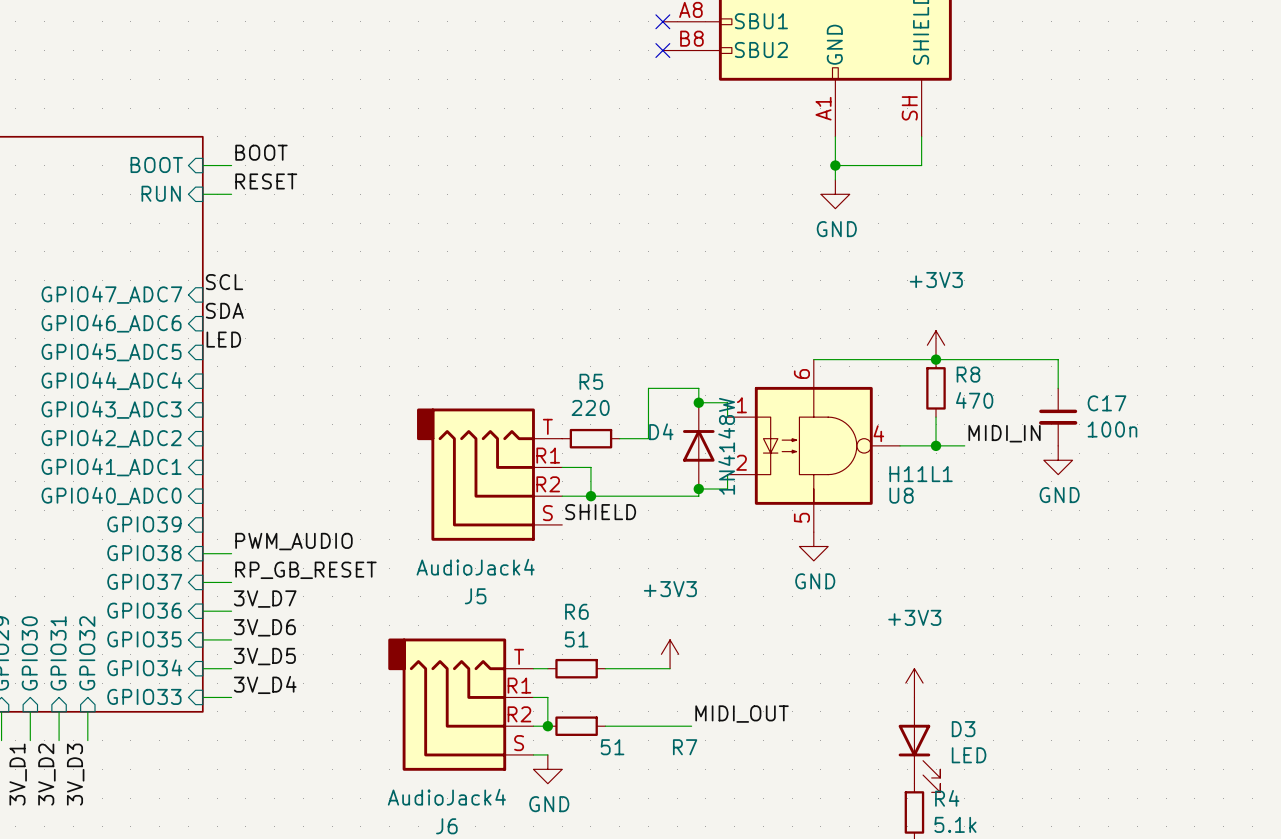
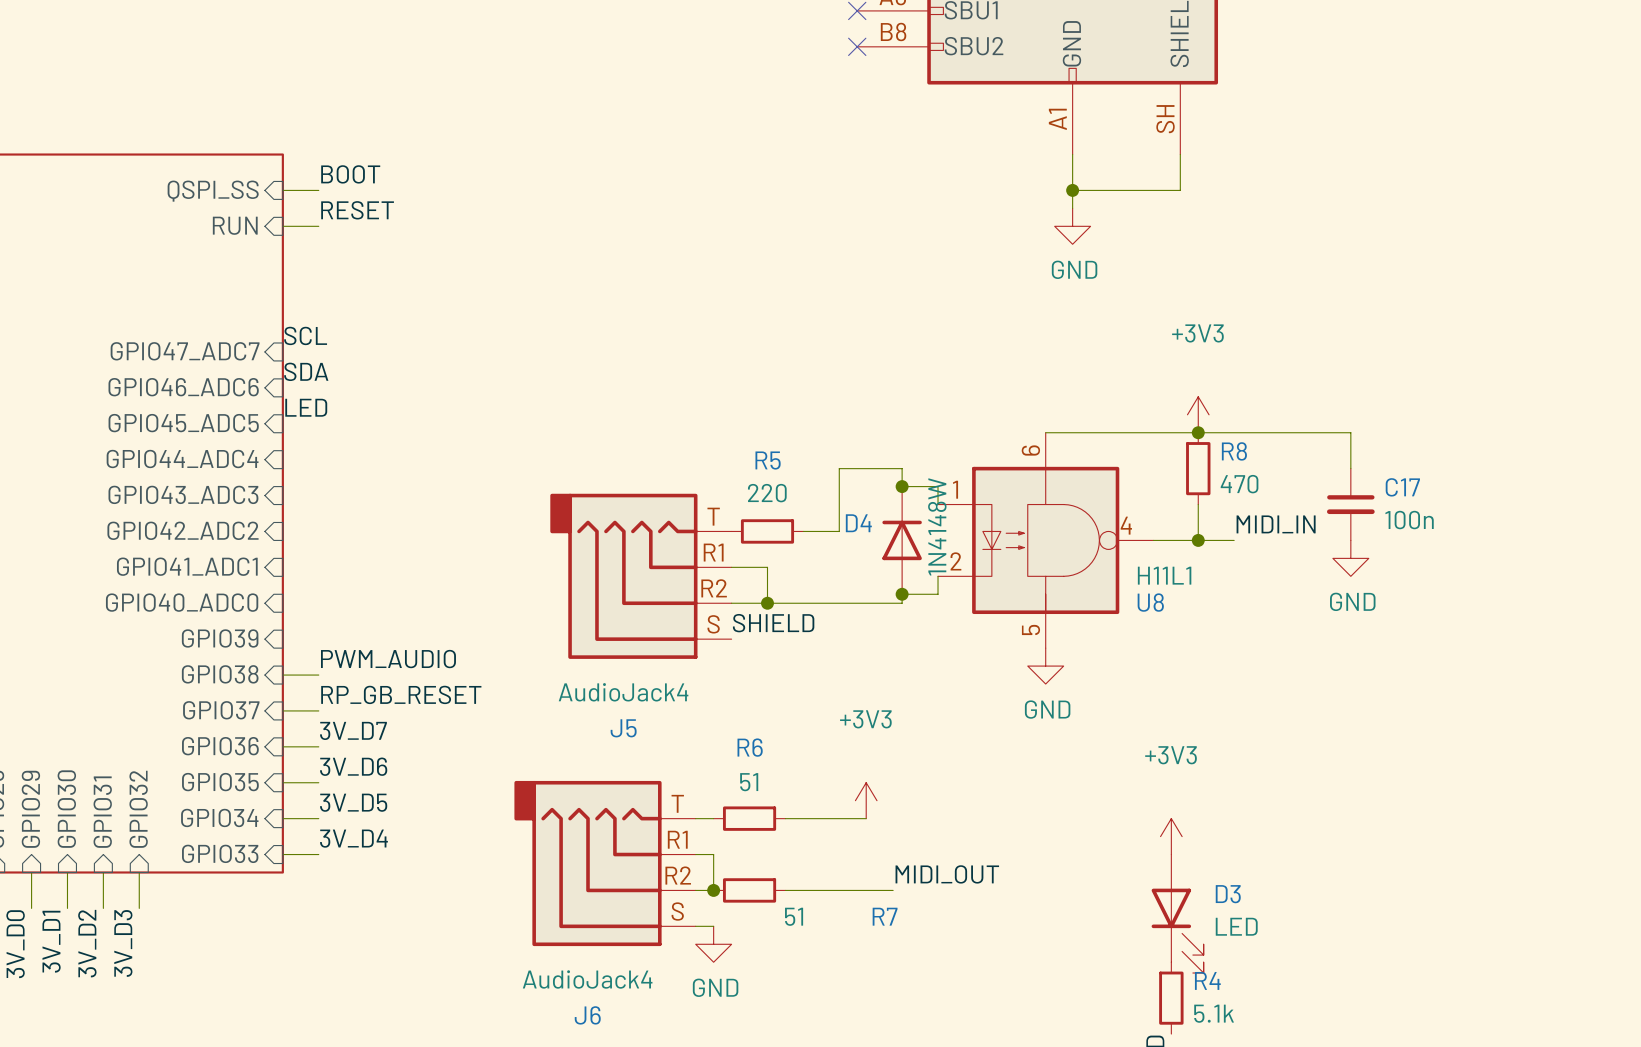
sheet pin: BOOT (156, 165) -> QSPI_SS (213, 191)

